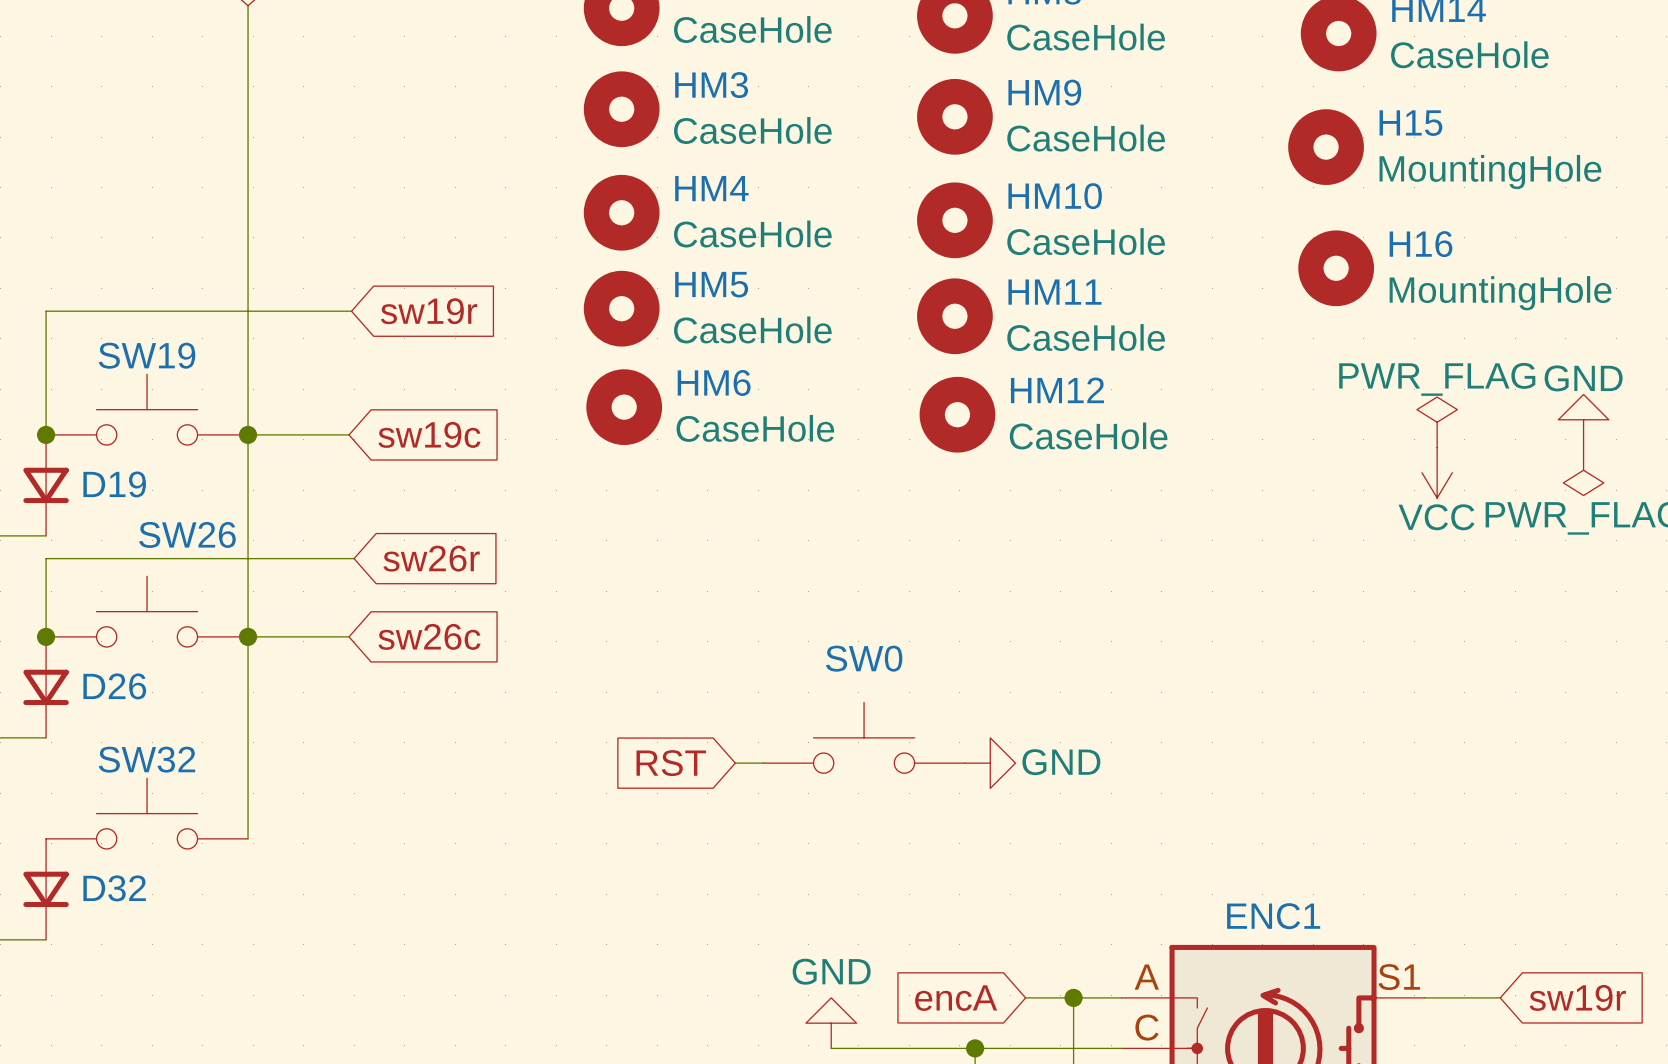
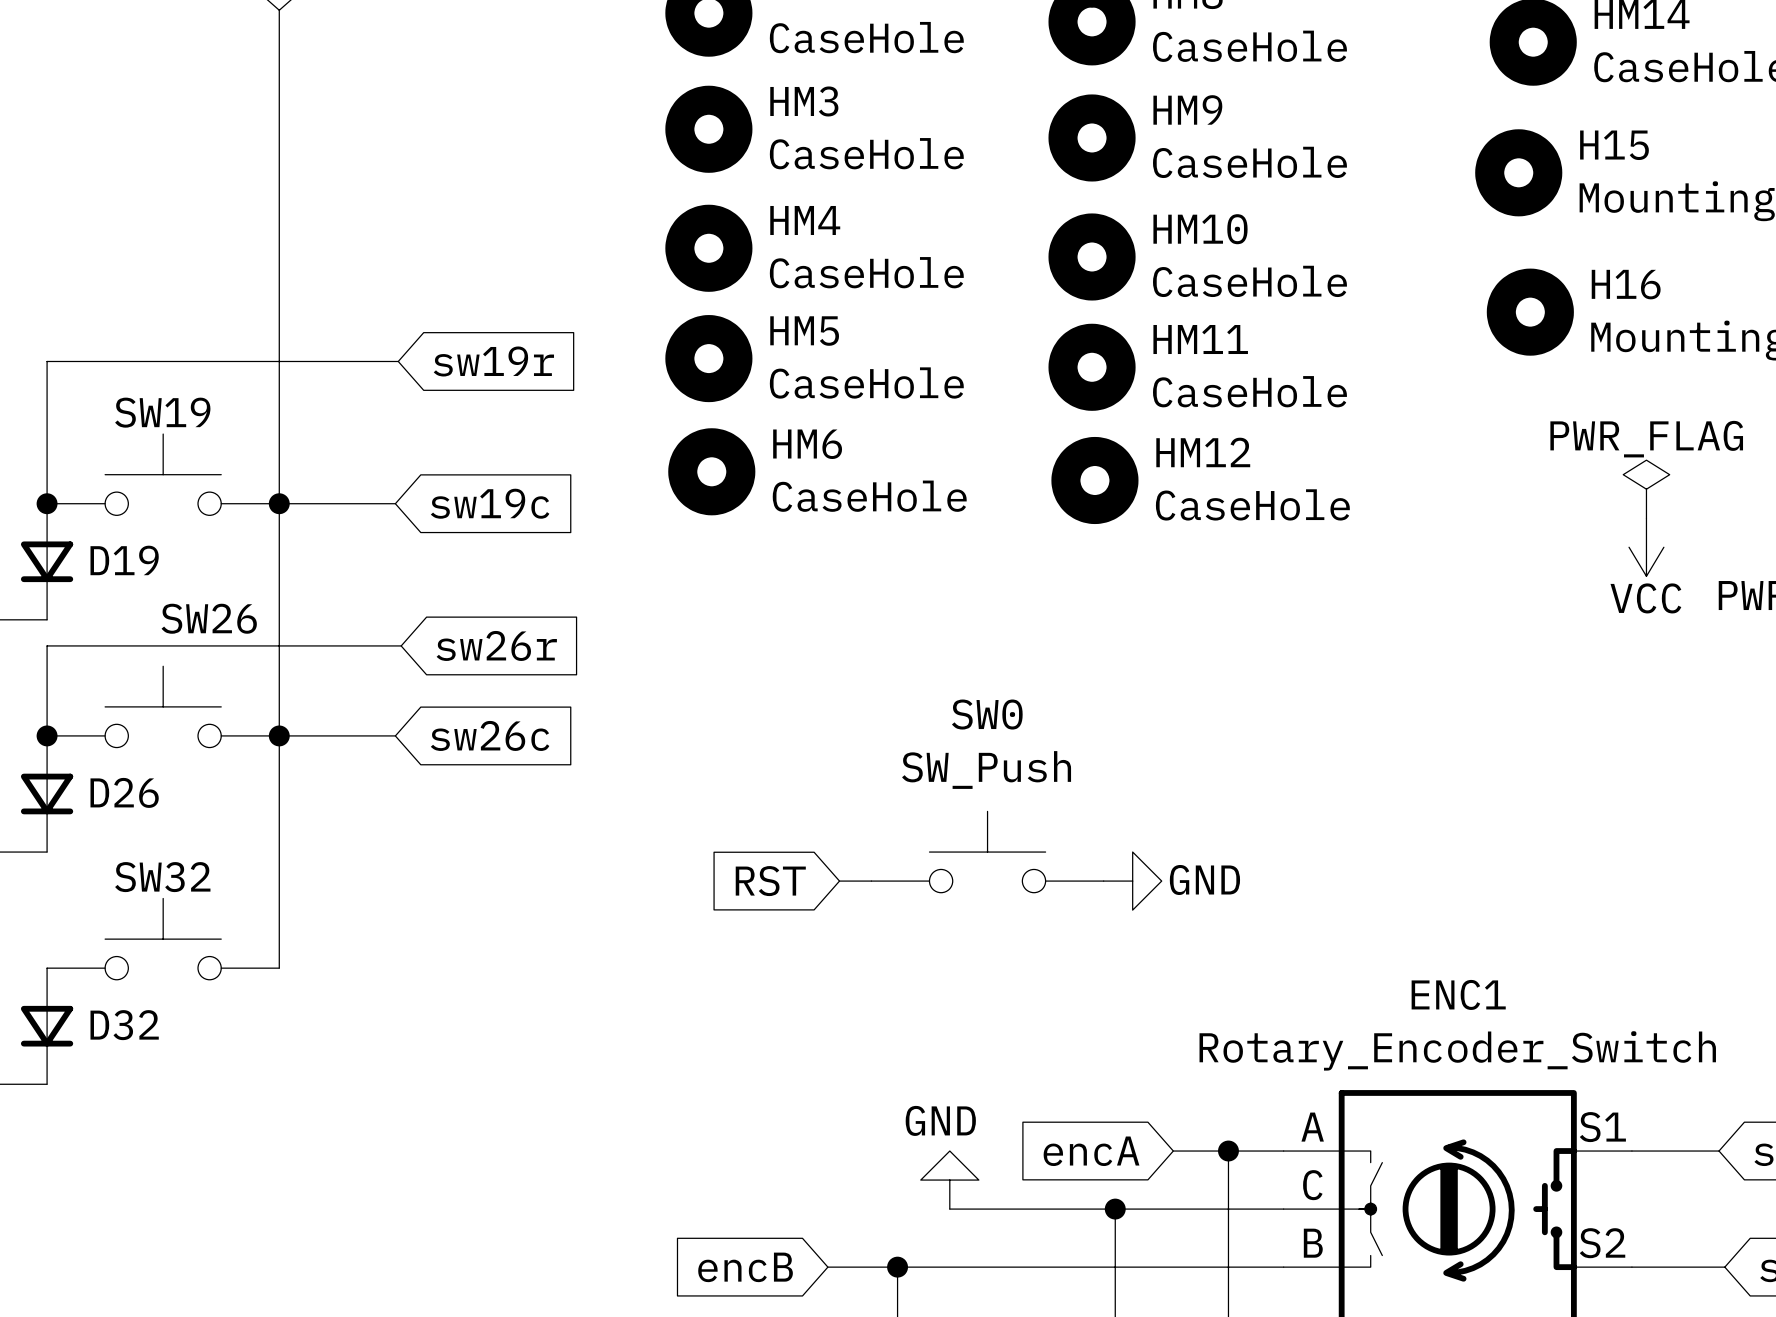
SW0 name position: SW0 (864, 658) -> SW0 (987, 714)
SW0 value: none -> SW_Push (986, 770)
ENC1 value: none -> Rotary_Encoder_Switch (1457, 1050)
ENC1 name position: ENC1 (1273, 916) -> ENC1 (1458, 994)

